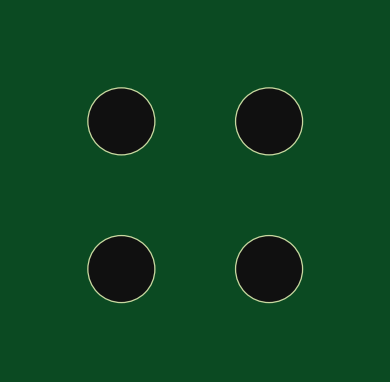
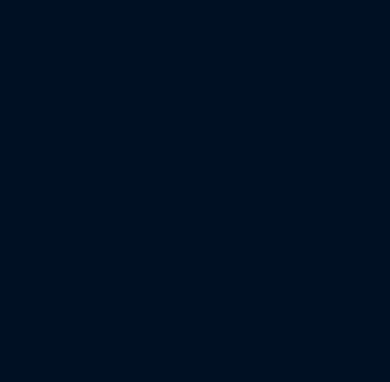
part: (121, 121) -> none
part: (269, 121) -> none
part: (121, 269) -> none
part: (269, 269) -> none

